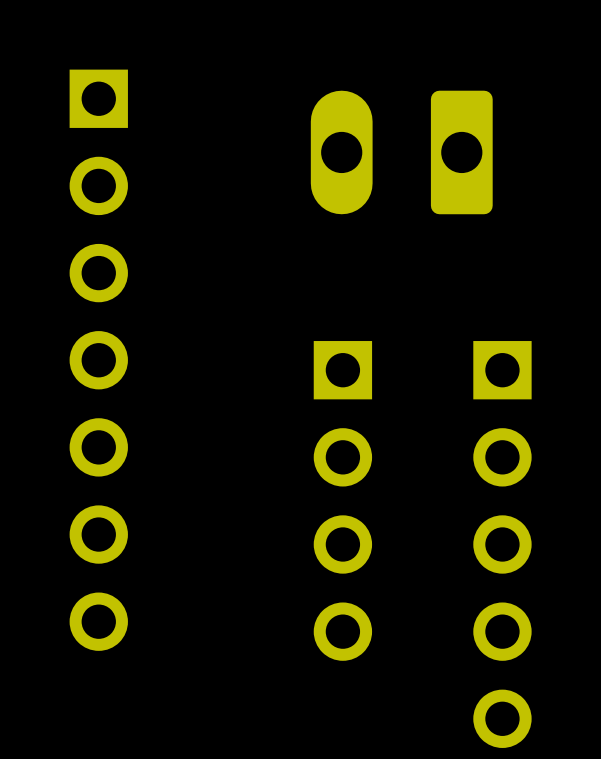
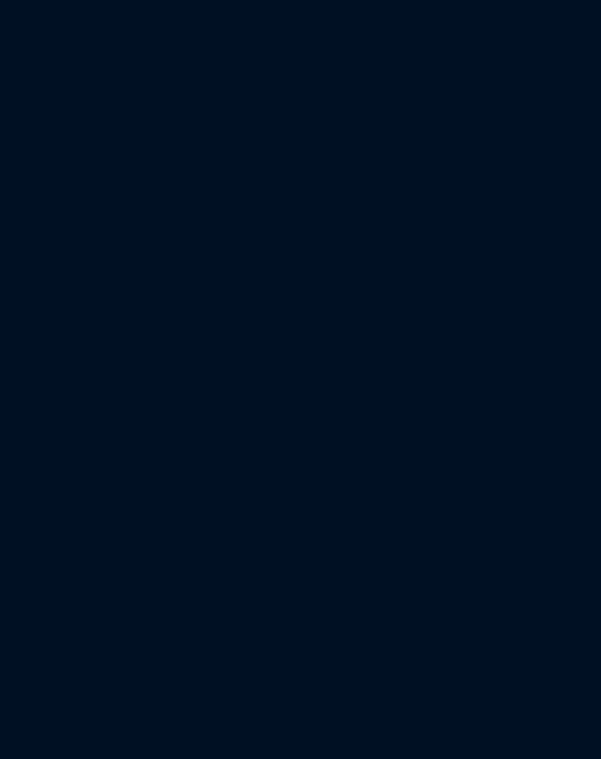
part: (401, 152) -> none
part: (98, 360) -> none
part: (342, 500) -> none
part: (502, 544) -> none

